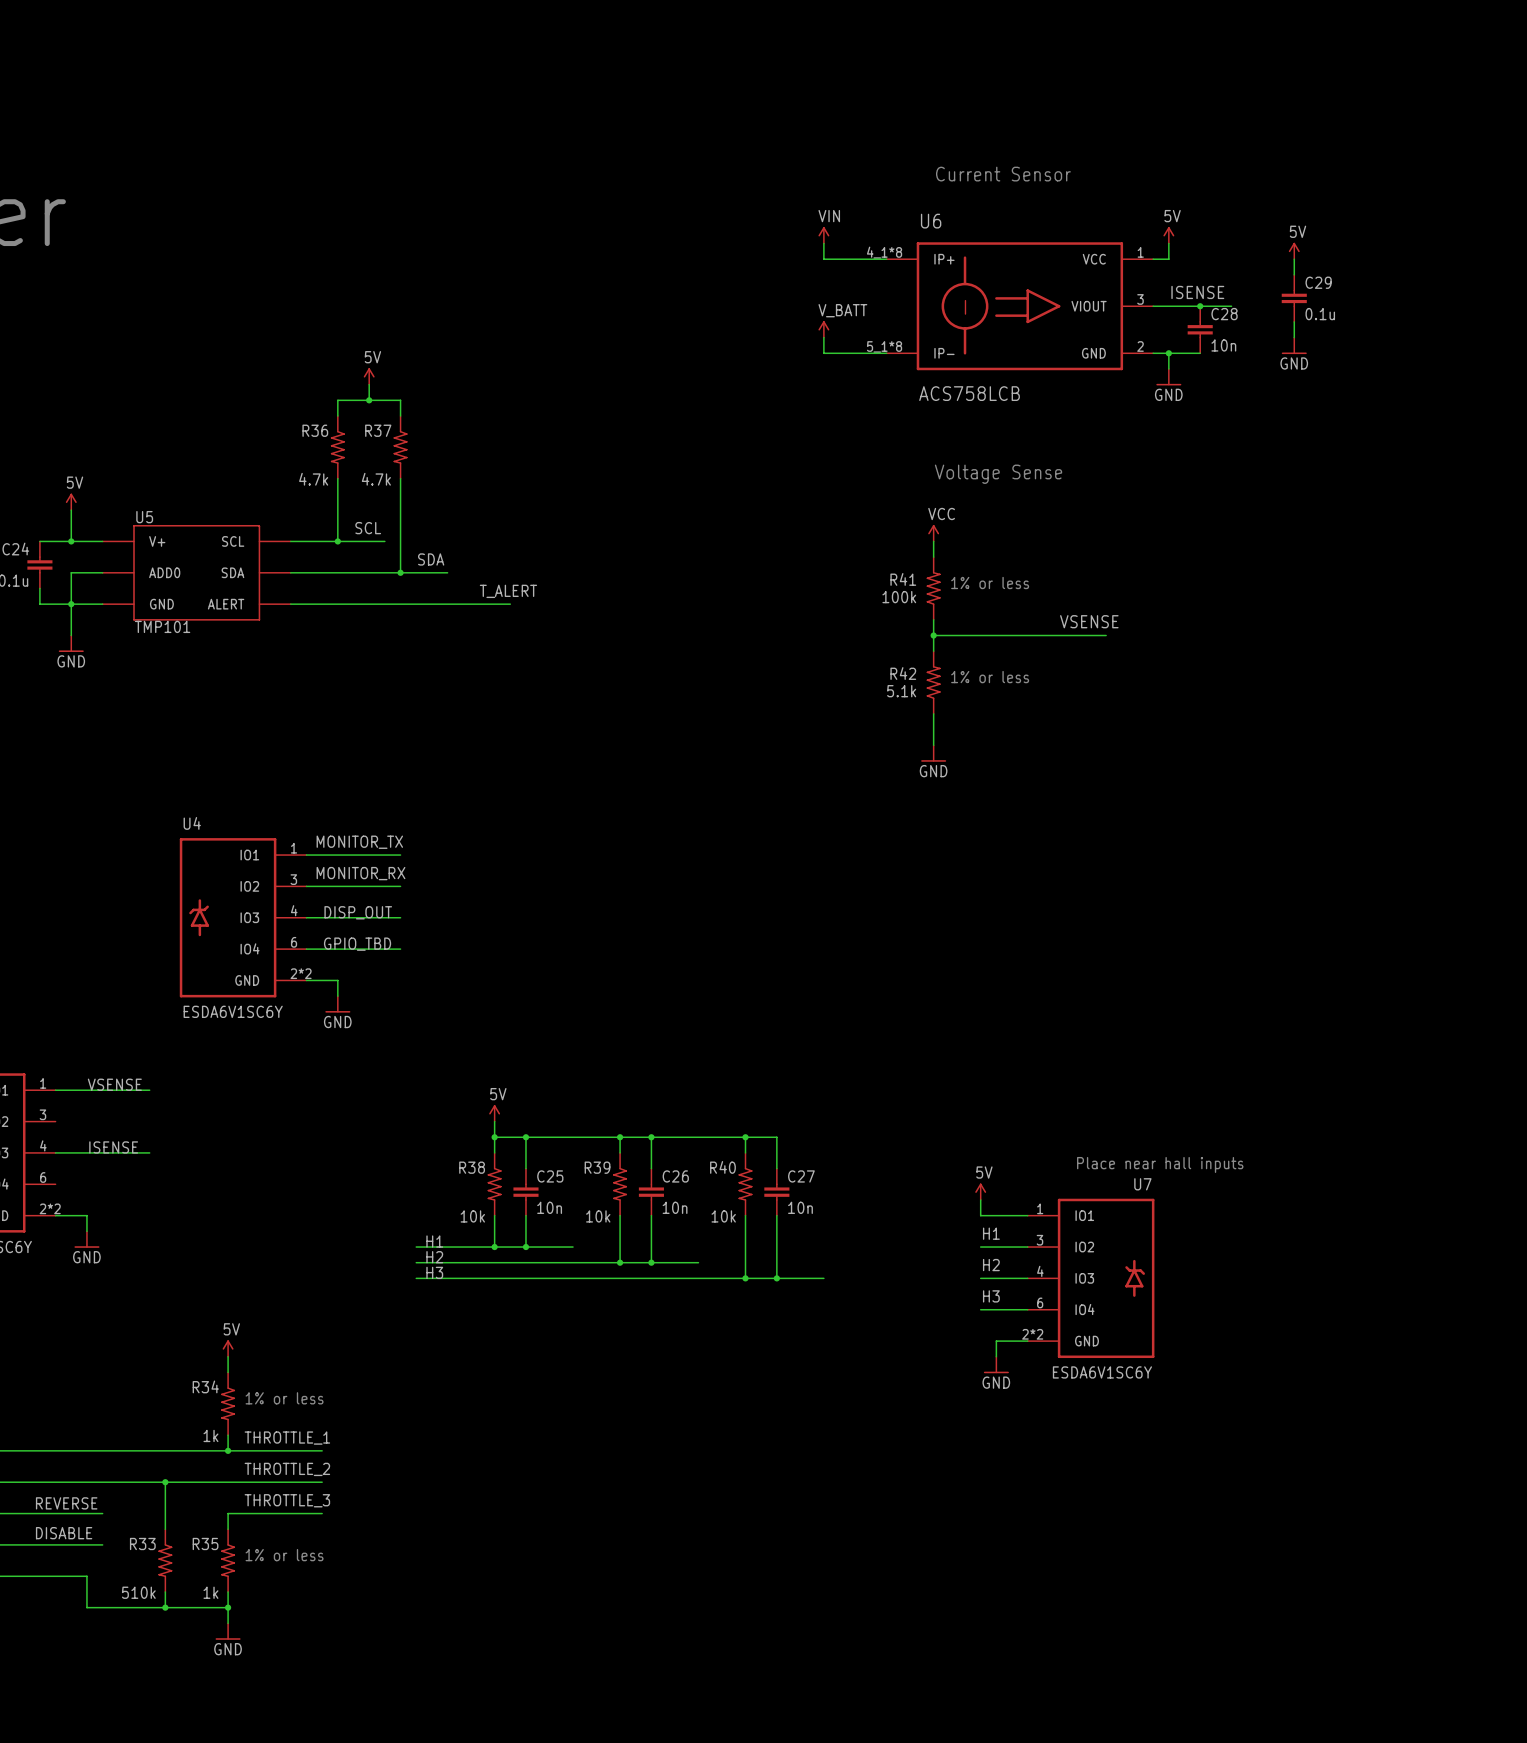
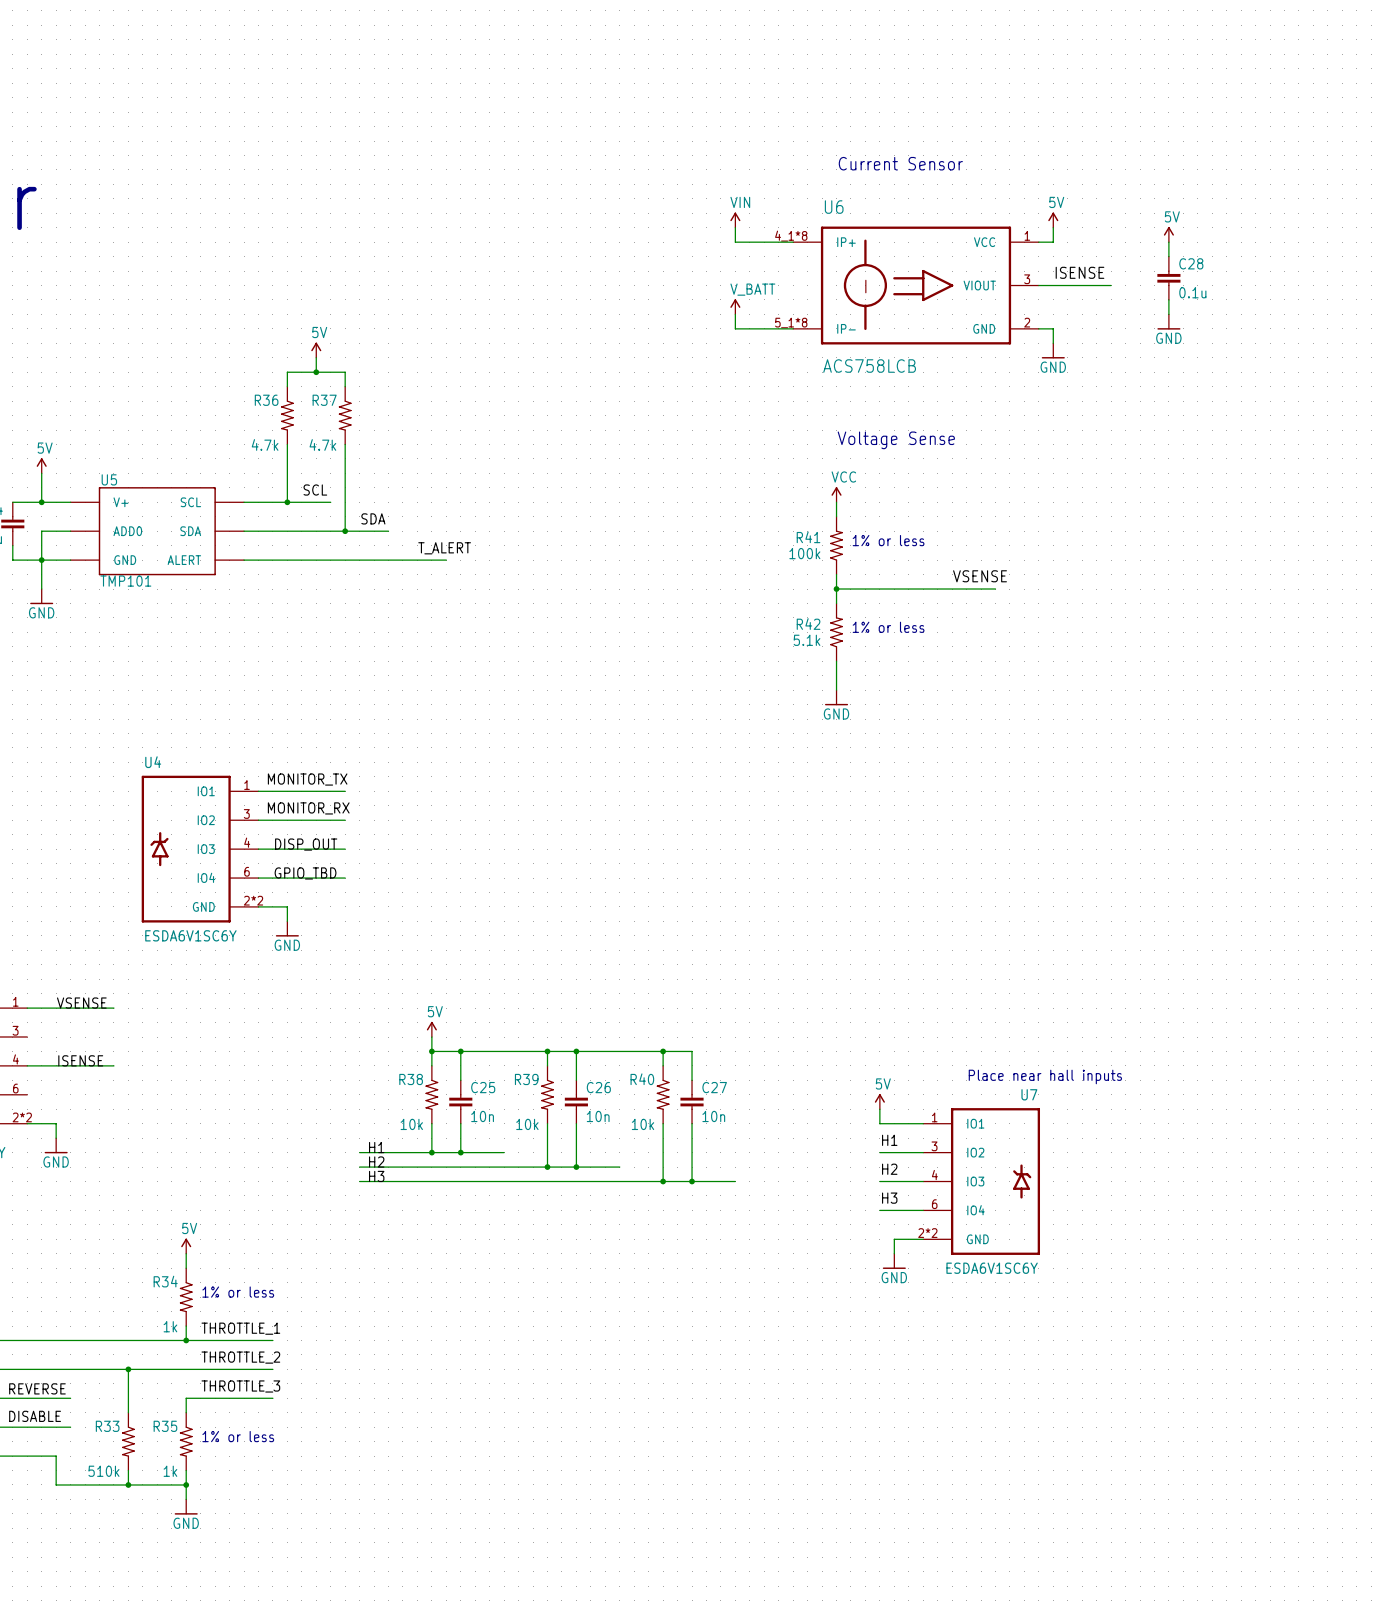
C29 name: C29 (1318, 282) -> C28 (1191, 263)
junction: (1200, 306) -> none
C28: 10n (1200, 329) -> none
wire: (1168, 353) (1200, 353) -> none
junction: (1168, 353) -> none

